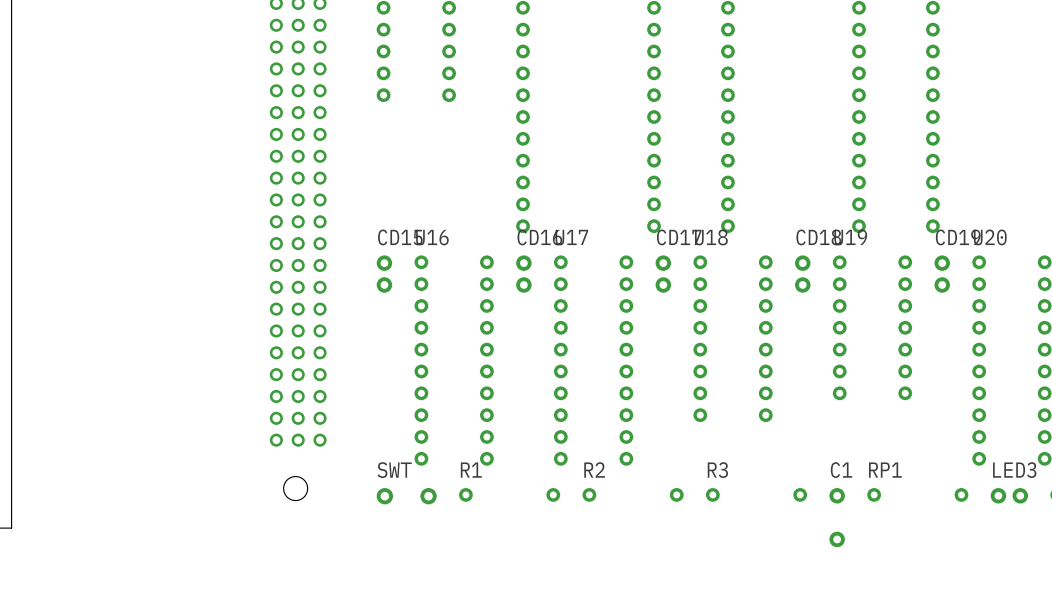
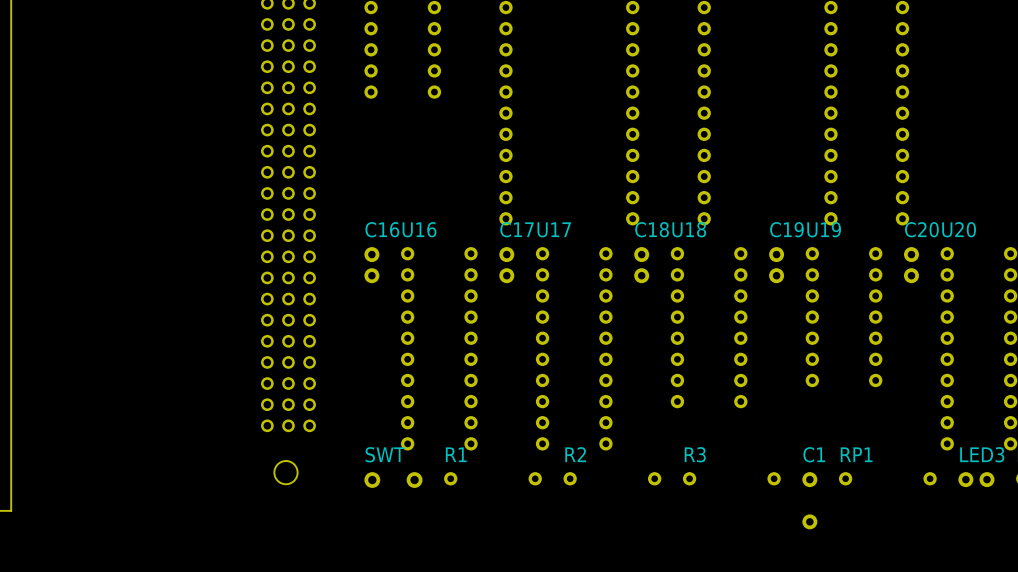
CD15 name: CD15 (400, 237) -> C16 (382, 229)
CD16 name: CD16 (539, 237) -> C17 (517, 229)
CD17 name: CD17 (679, 237) -> C18 (652, 229)
CD18 name: CD18 (818, 237) -> C19 (786, 229)
CD19 name: CD19 (958, 237) -> C20 (921, 229)

